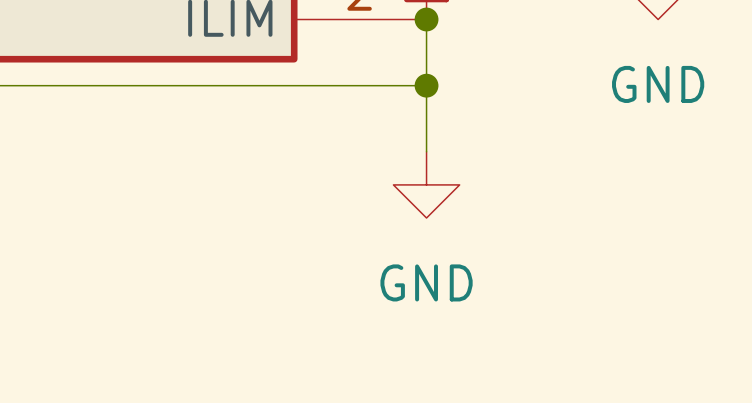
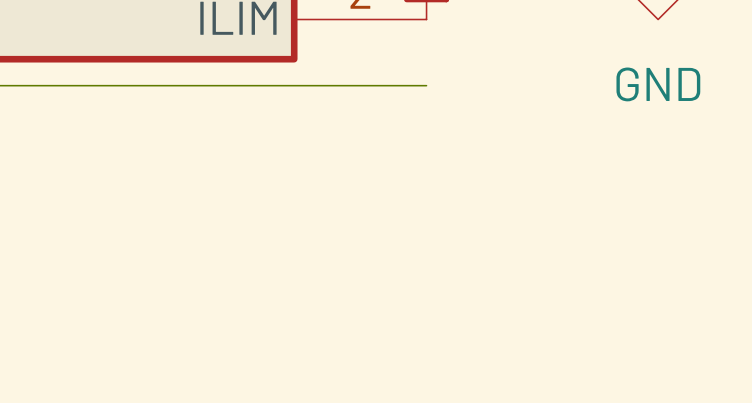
wire: (426, 19) (426, 151) -> none
junction: (426, 19) -> none
junction: (426, 85) -> none
power symbol: GND (426, 184) -> none

